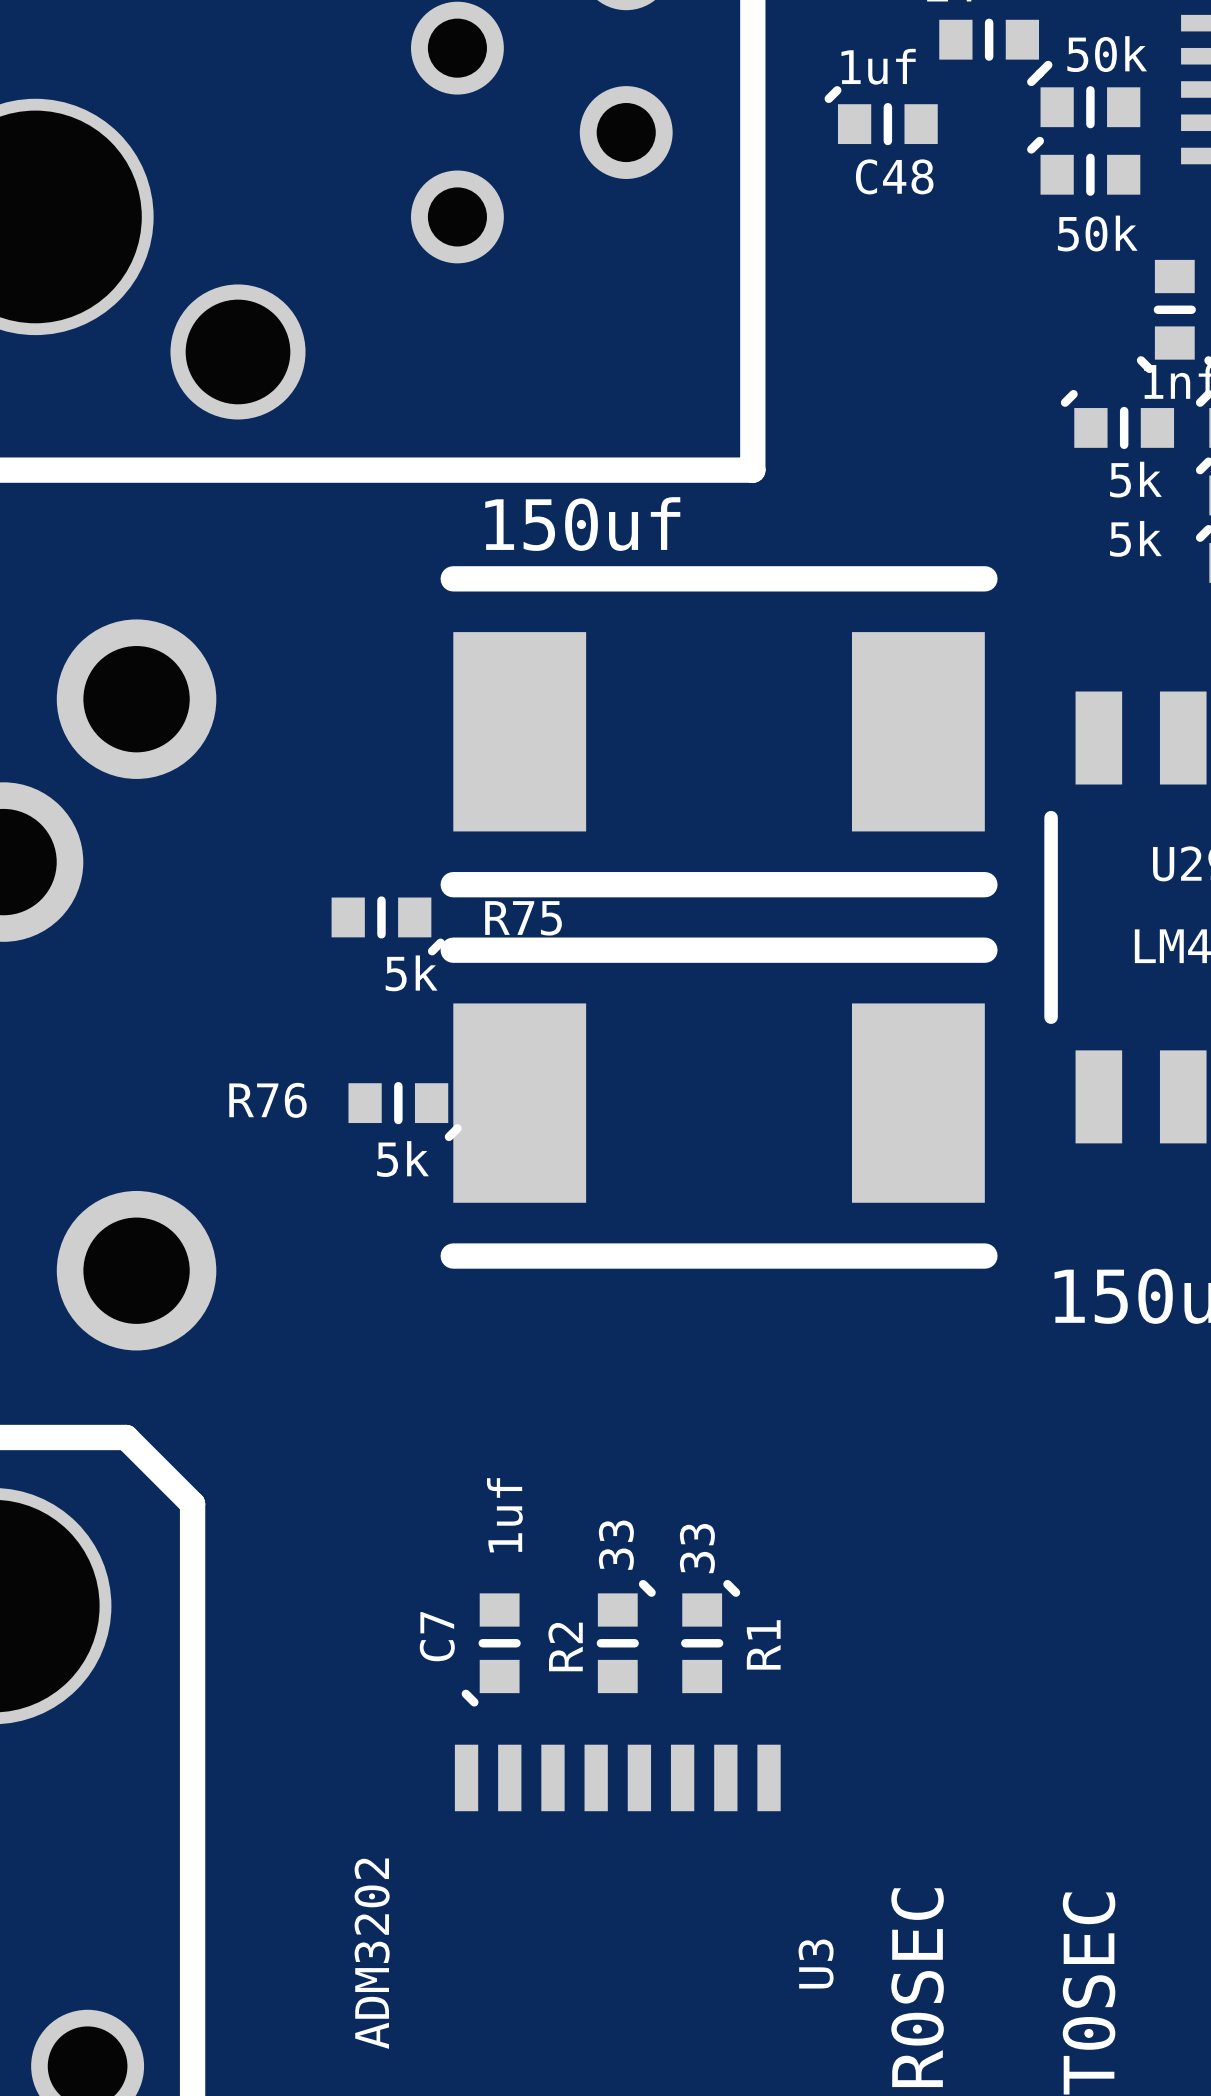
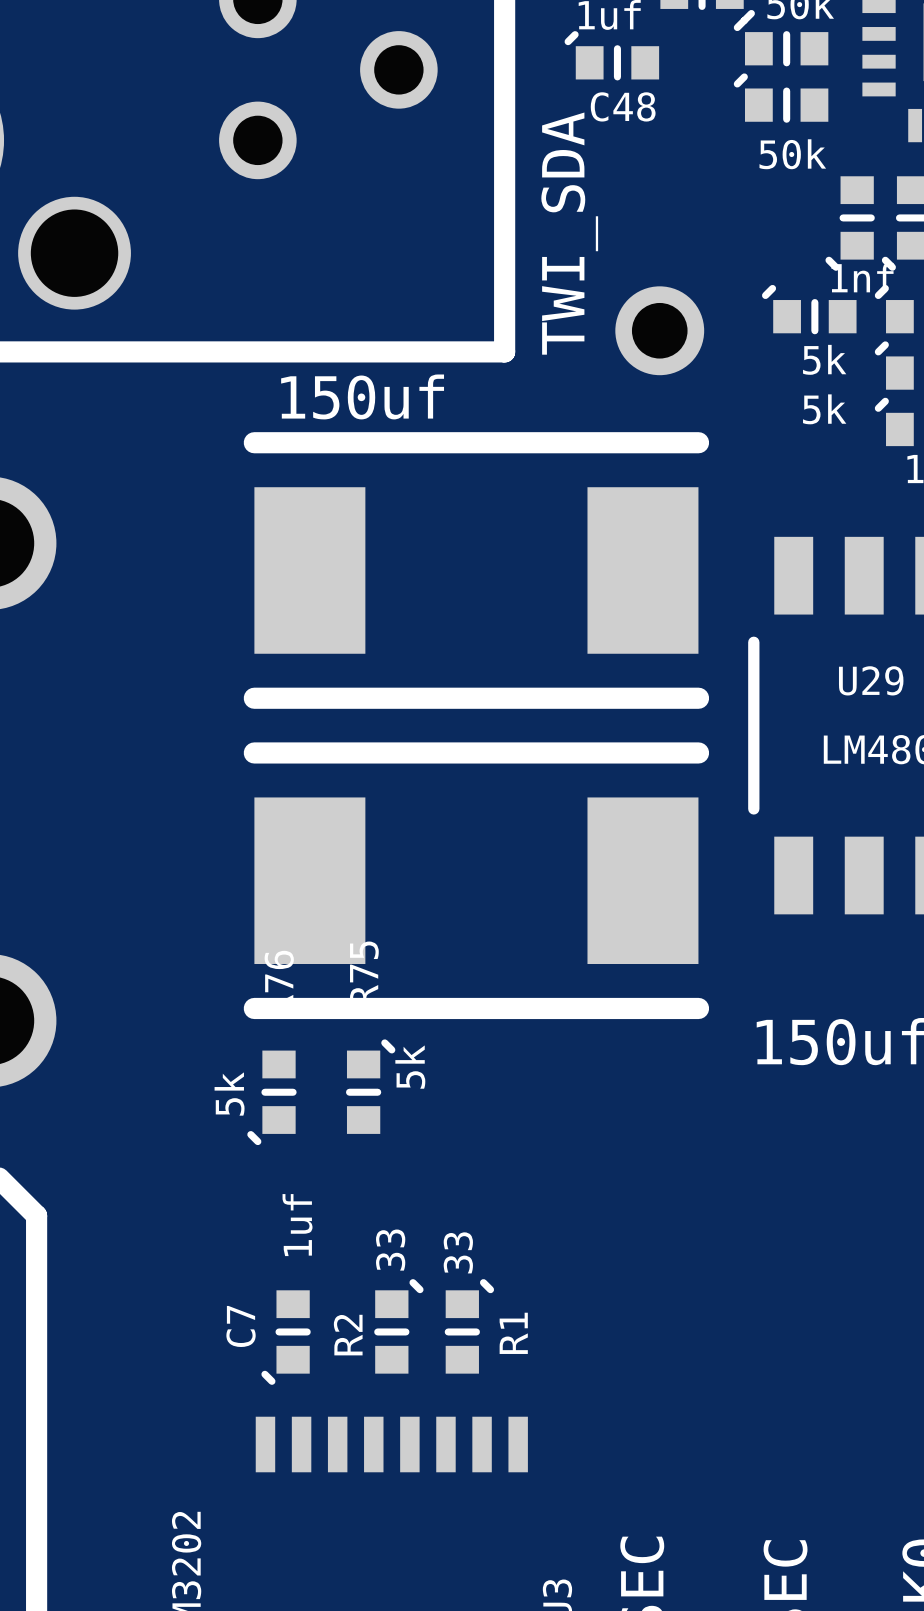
part: none -> TWI_SDA (659, 330)
R75 rotation: 0° (388, 925) -> 90° counterclockwise (370, 1086)
R75 position: (388, 925) -> (370, 1086)
R76 rotation: 0° (405, 1111) -> 90° clockwise (271, 1097)
R76 position: (405, 1111) -> (271, 1097)

